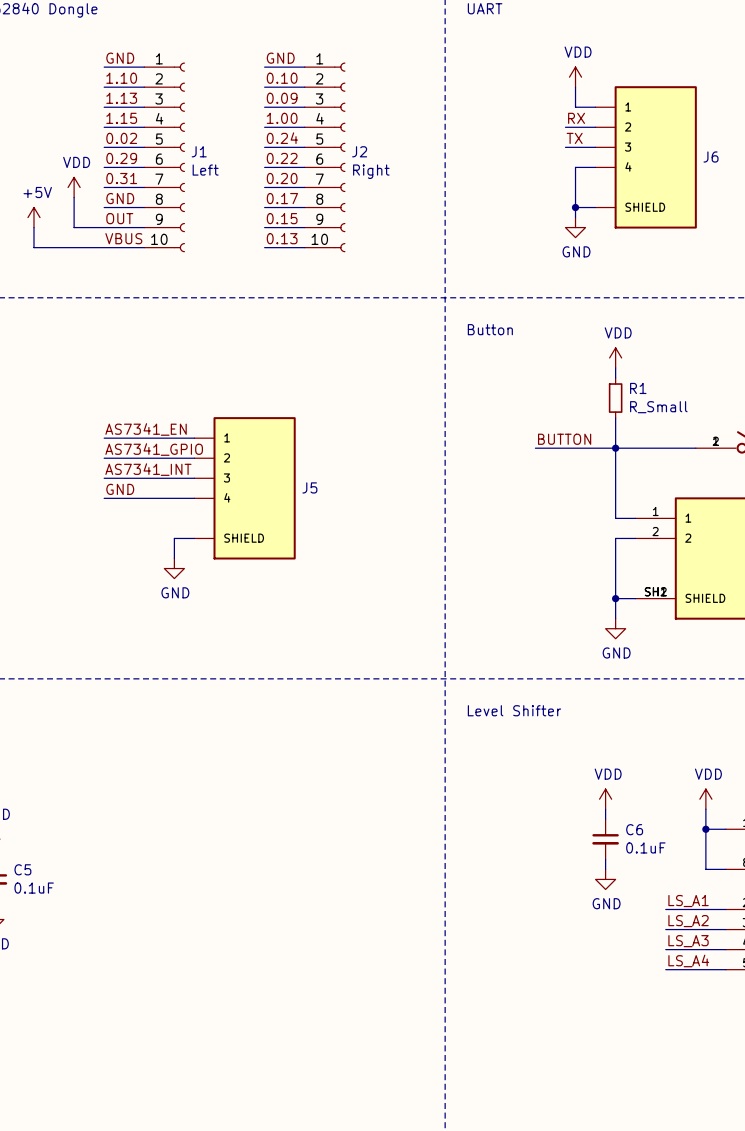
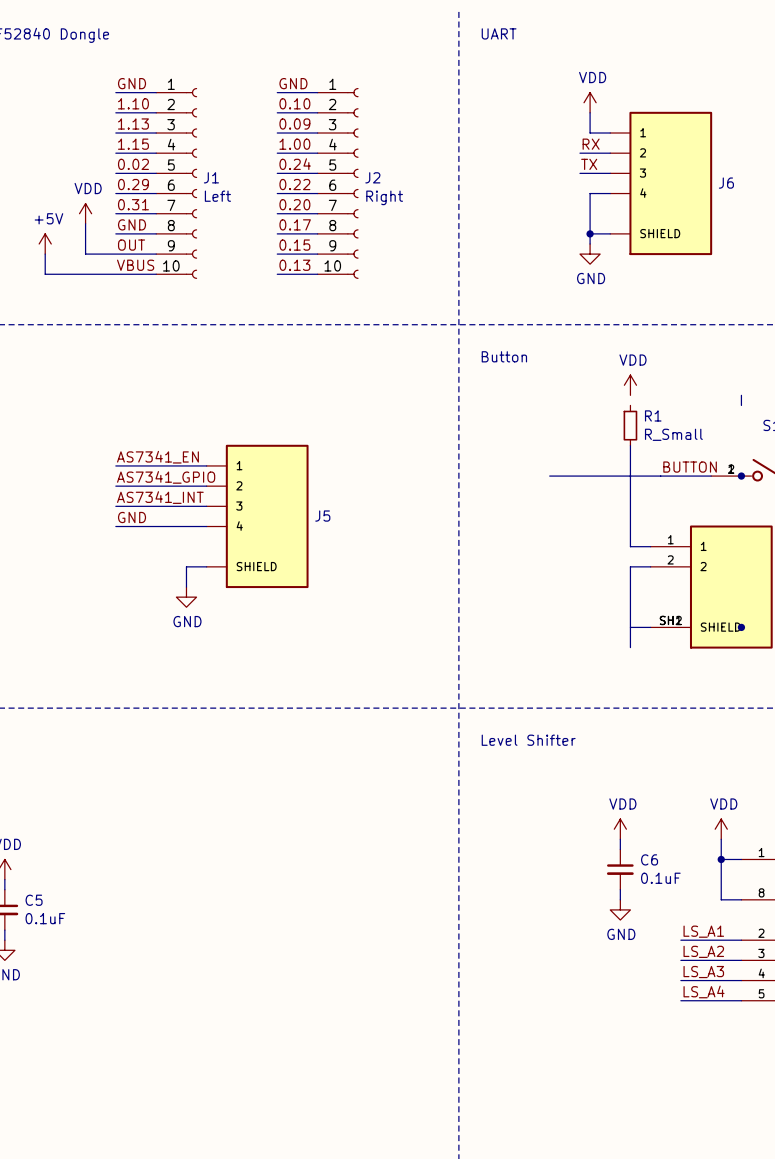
wire: (615, 367) (615, 378) -> (741, 395) (741, 405)
label position: BUTTON (564, 439) -> BUTTON (690, 467)
junction: (615, 448) -> none
junction: none -> (741, 476)
junction: (615, 598) -> none
junction: none -> (741, 627)
power symbol: GND (615, 628) -> none

